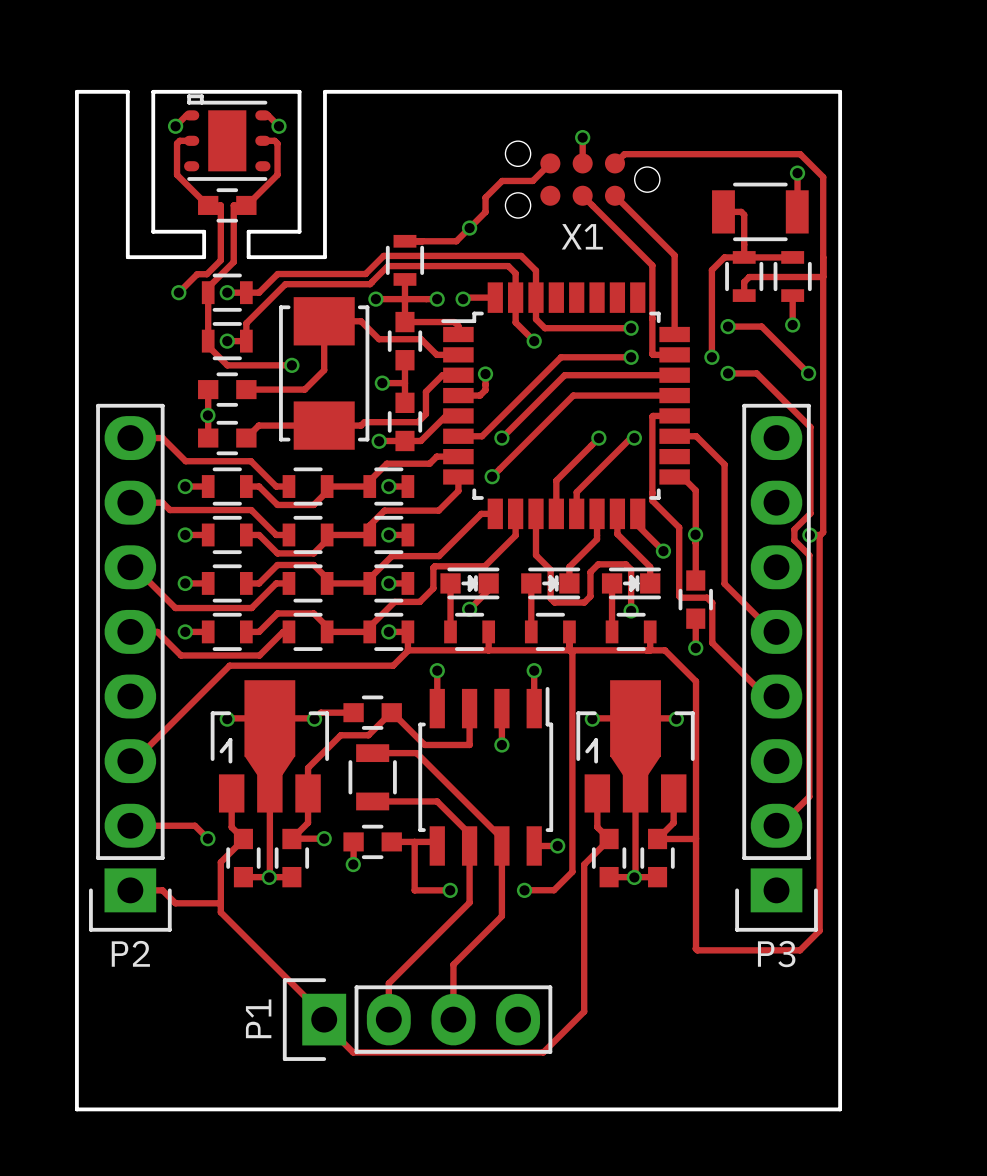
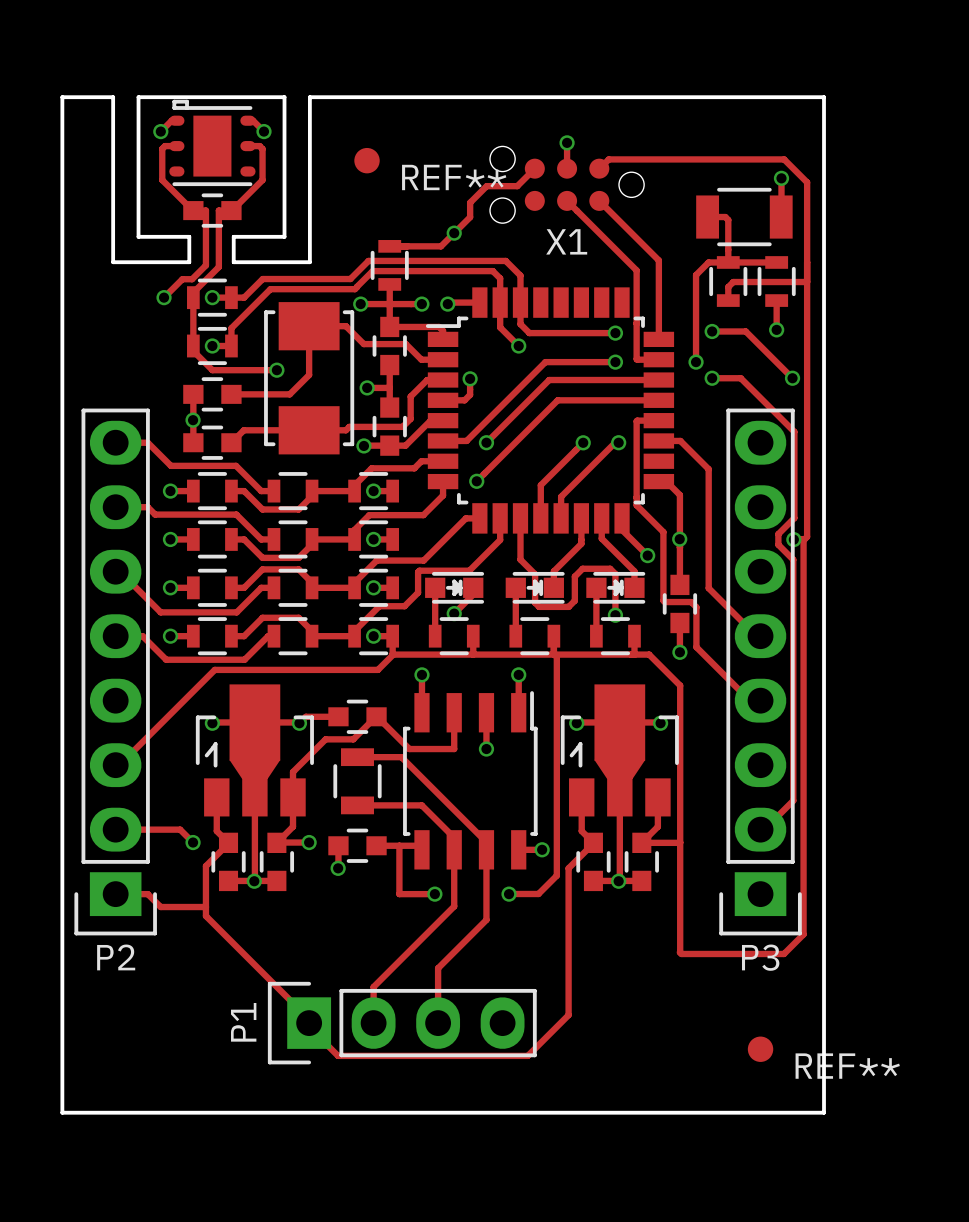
REF**: none -> (367, 160)
REF**: none -> (760, 1049)

